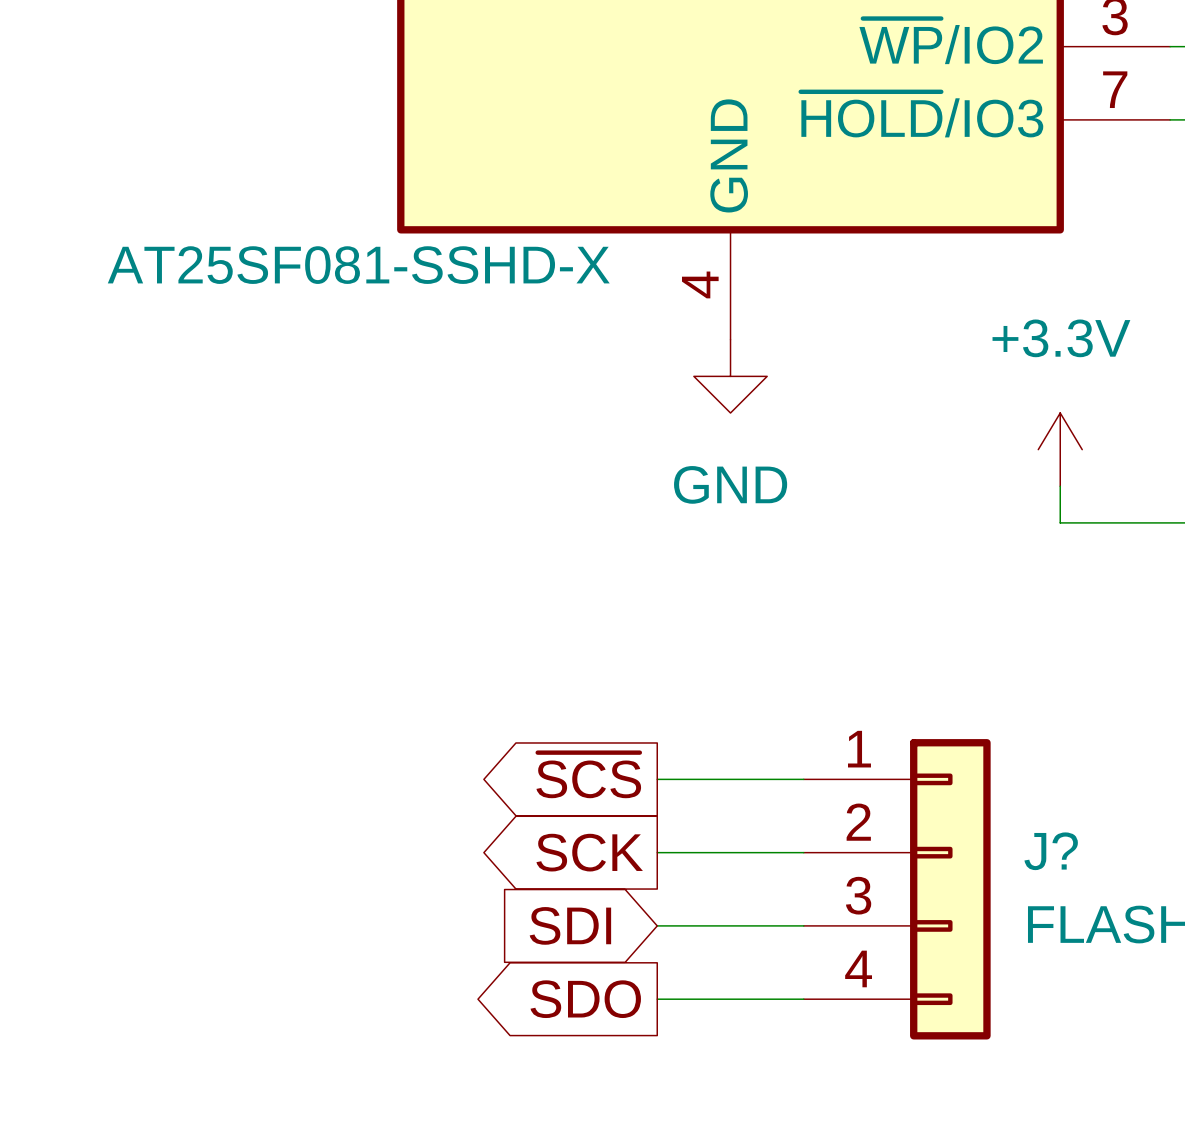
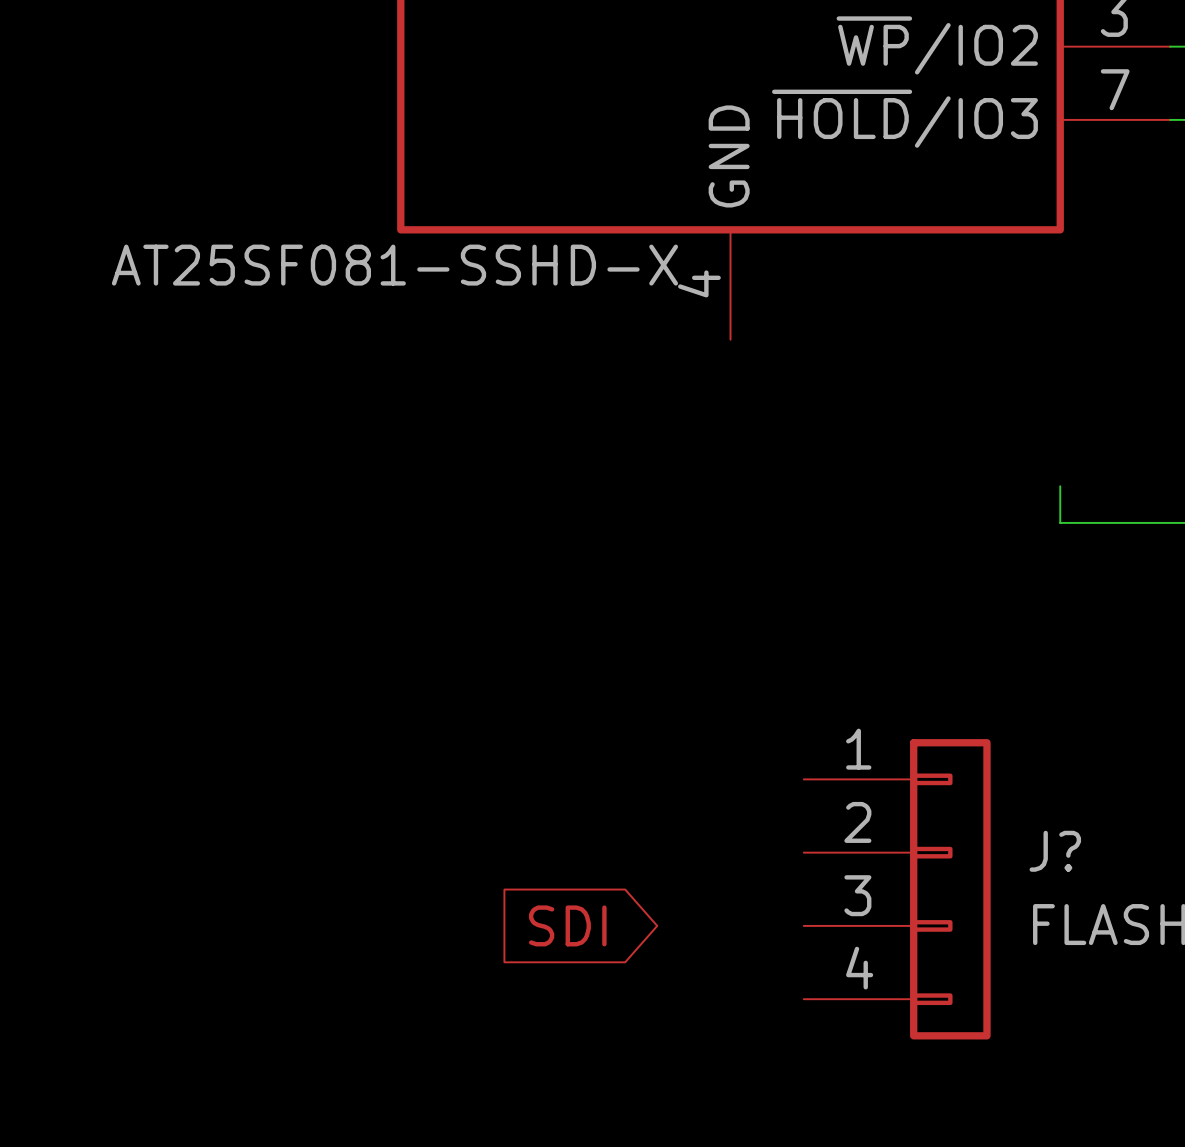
power symbol: GND (730, 376) -> none
power symbol: +3.3V (1060, 449) -> none
global label: ~{SCS} (588, 775) -> none
wire: (657, 779) (803, 779) -> none
global label: SCK (589, 852) -> none
wire: (657, 852) (803, 852) -> none
wire: (657, 925) (803, 925) -> none
global label: SDO (585, 999) -> none
wire: (657, 999) (803, 999) -> none

